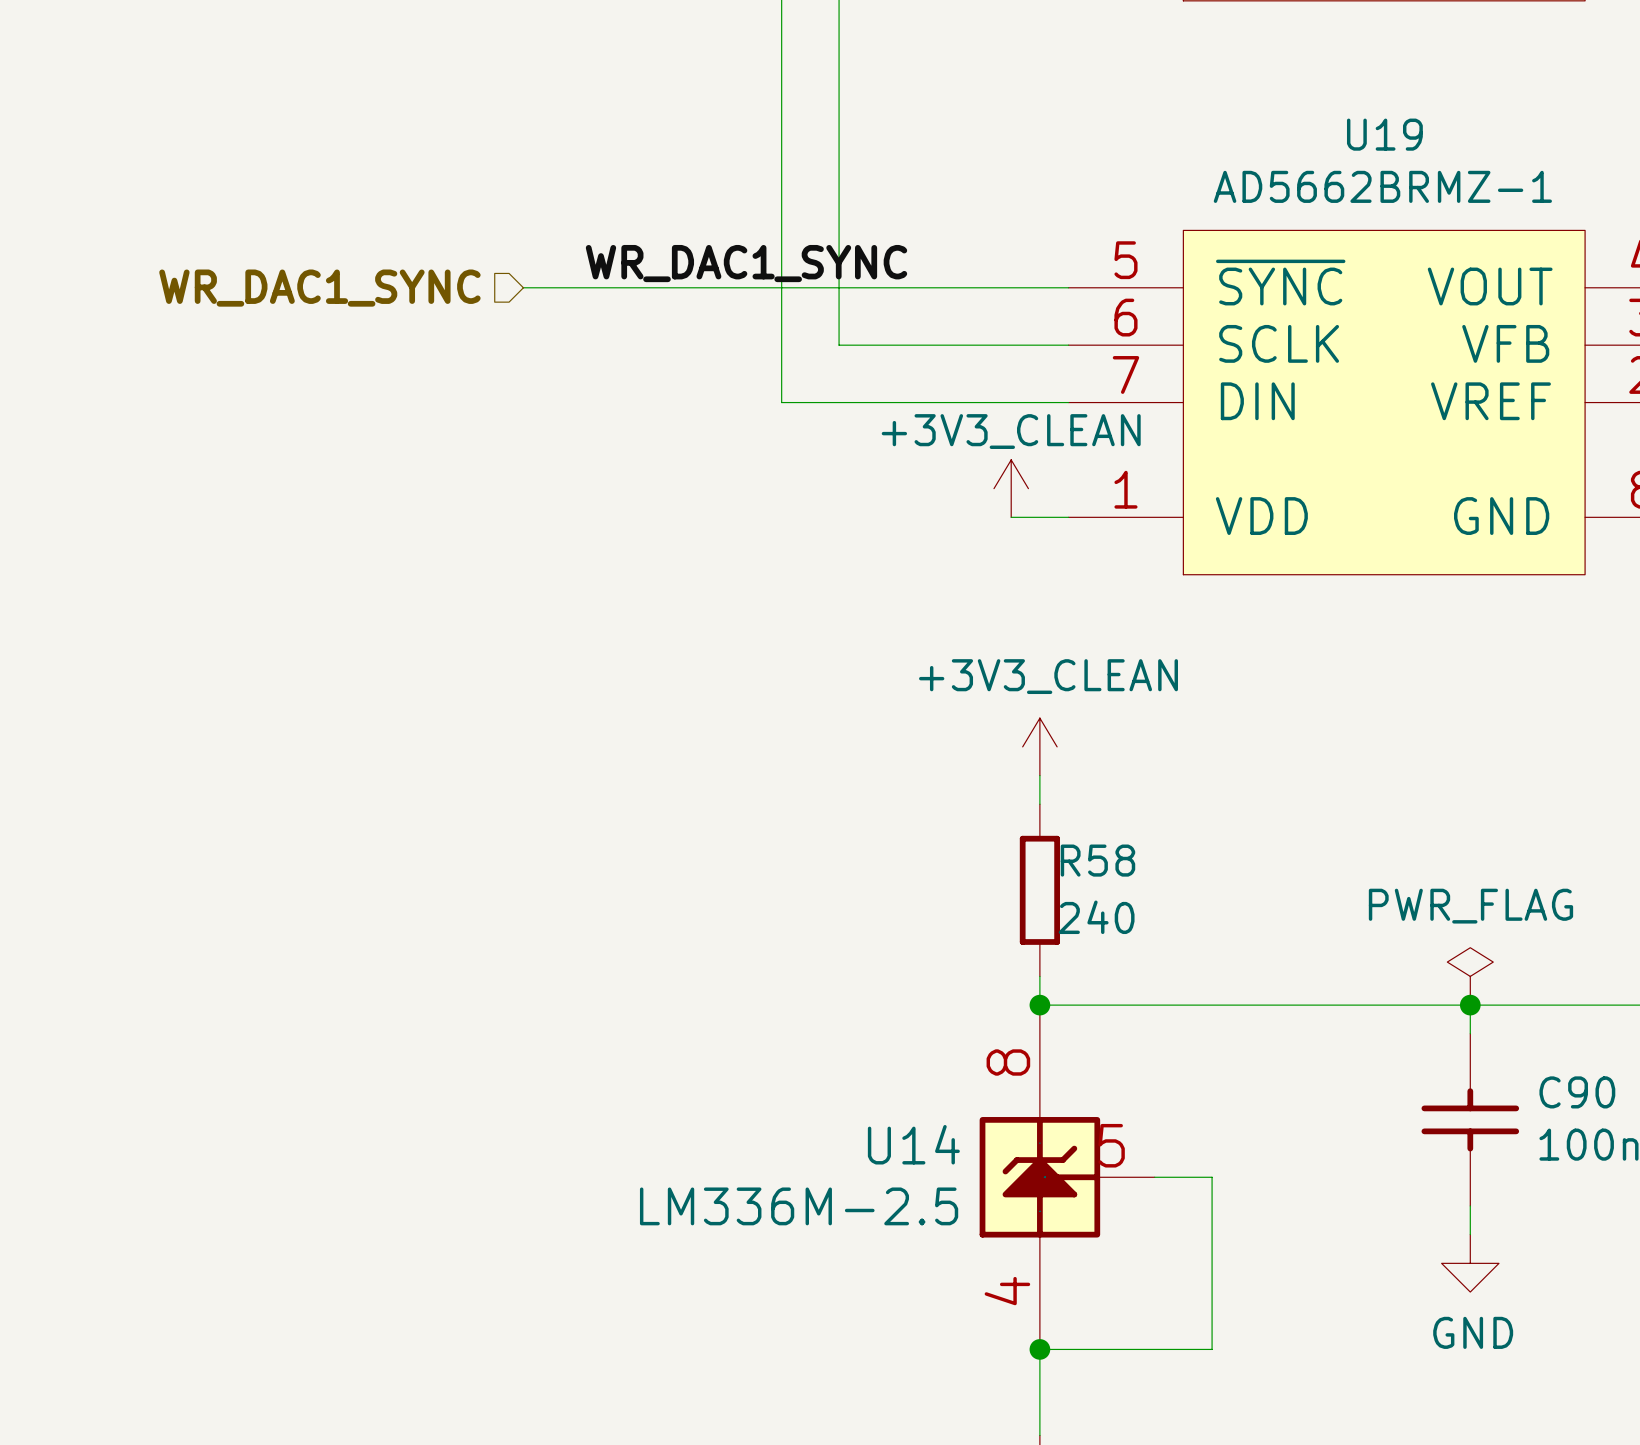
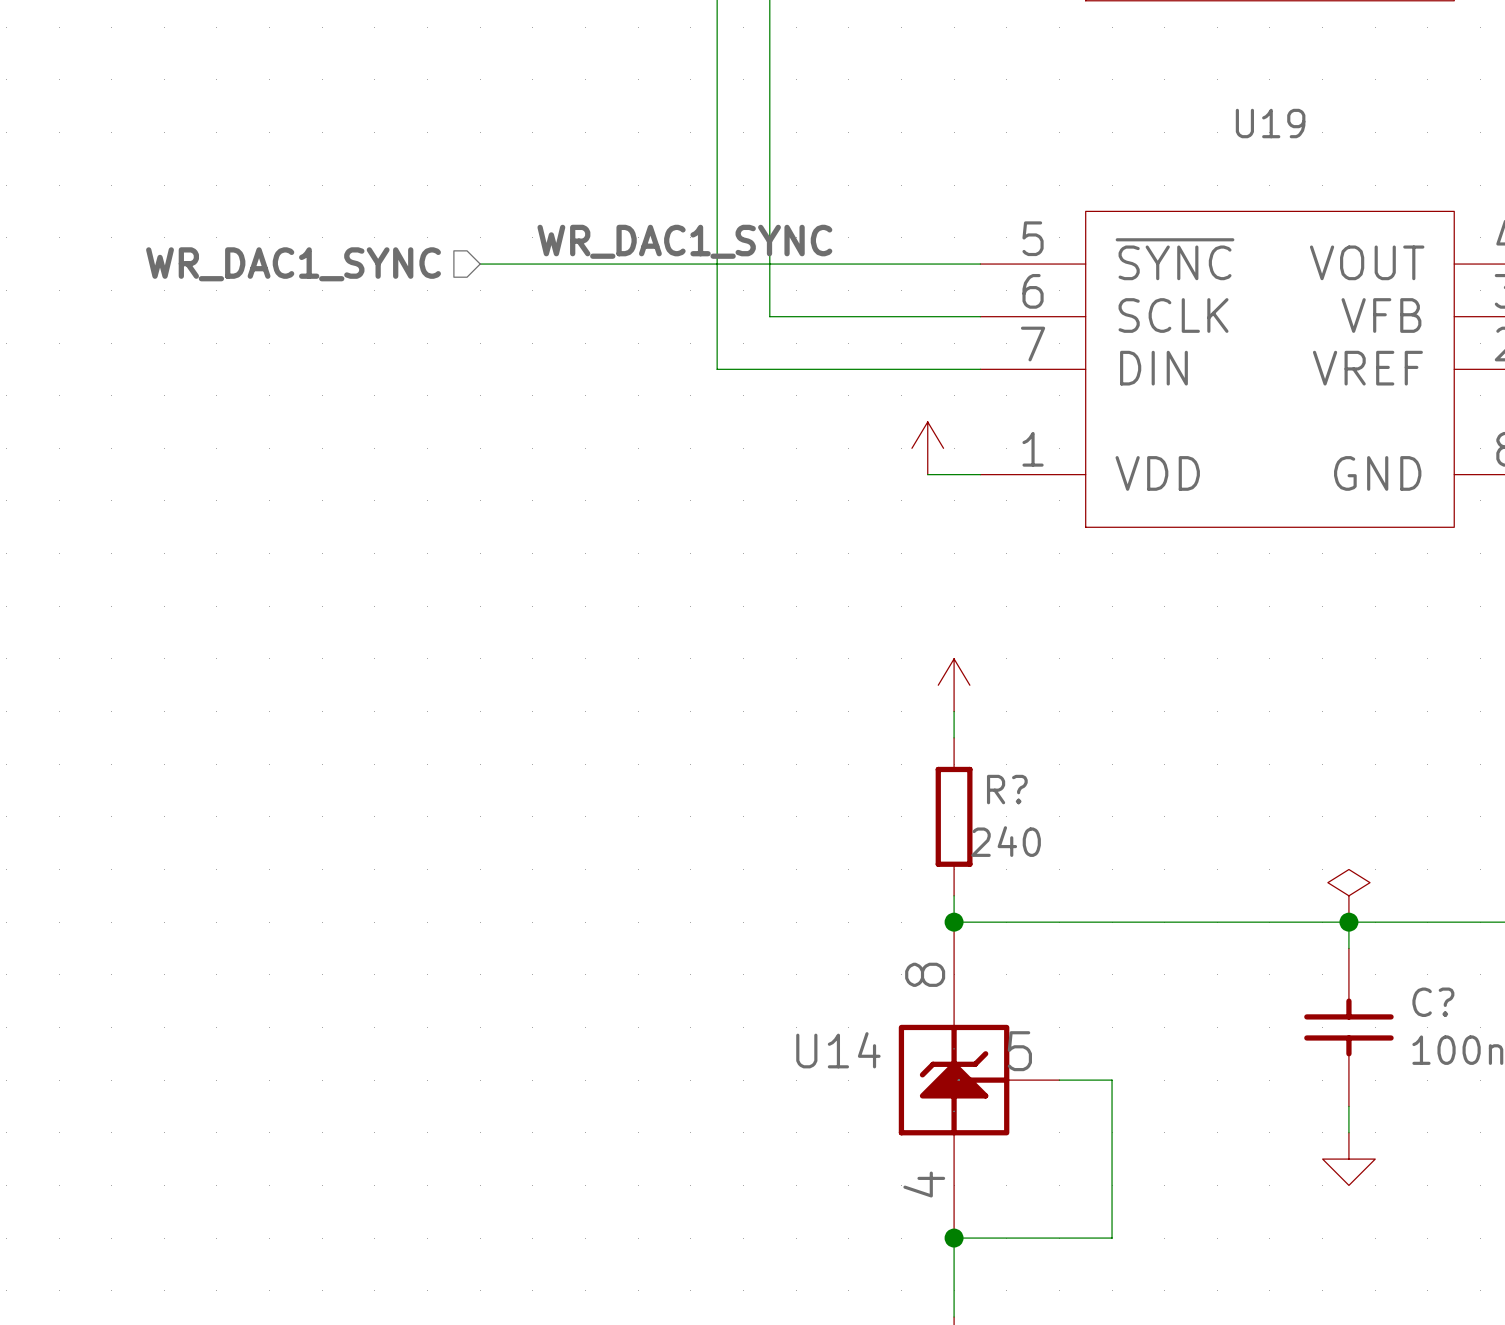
U19 value: AD5662BRMZ-1 (1382, 186) -> none
power symbol text: +3V3_CLEAN (1011, 431) -> none
power symbol text: +3V3_CLEAN (1048, 676) -> none
R58 name: R58 (1097, 860) -> R? (1007, 789)
power symbol text: PWR_FLAG (1470, 906) -> none
C90 name: C90 (1577, 1092) -> C? (1433, 1002)
U14 value: LM336M-2.5 (799, 1206) -> none
power symbol text: GND (1473, 1332) -> none

